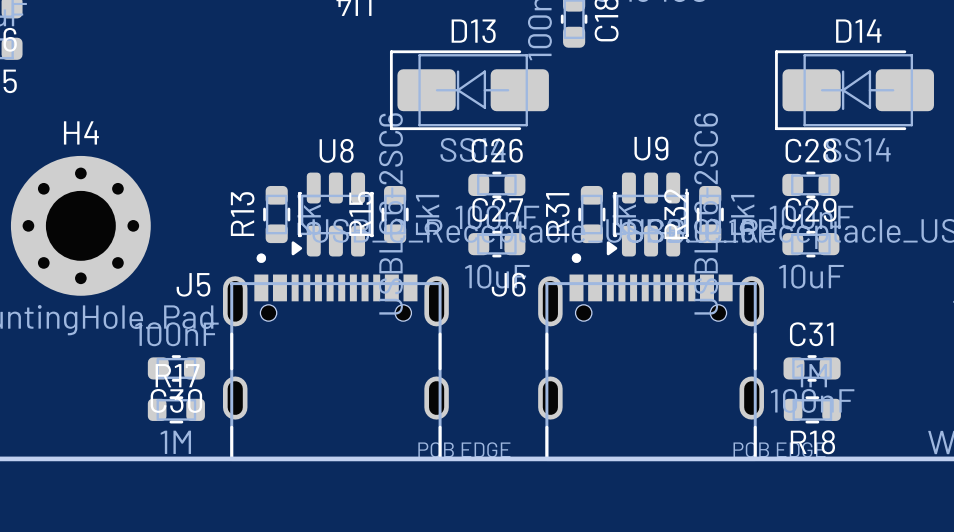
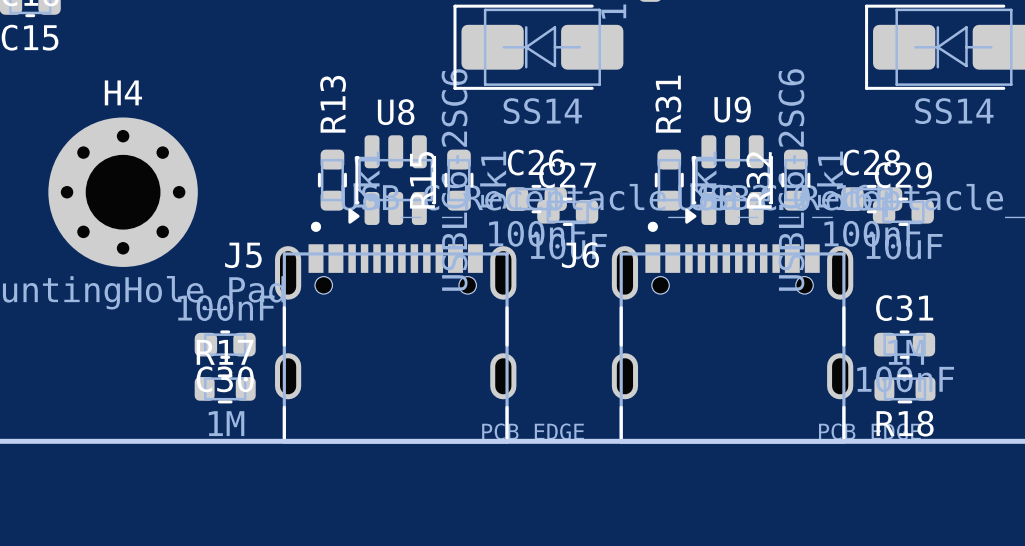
C26 position: (496, 184) -> (536, 199)
C28 position: (810, 184) -> (871, 199)
R13 name position: R13 (242, 214) -> R13 (333, 104)
R31 name position: R31 (557, 214) -> R31 (668, 104)

